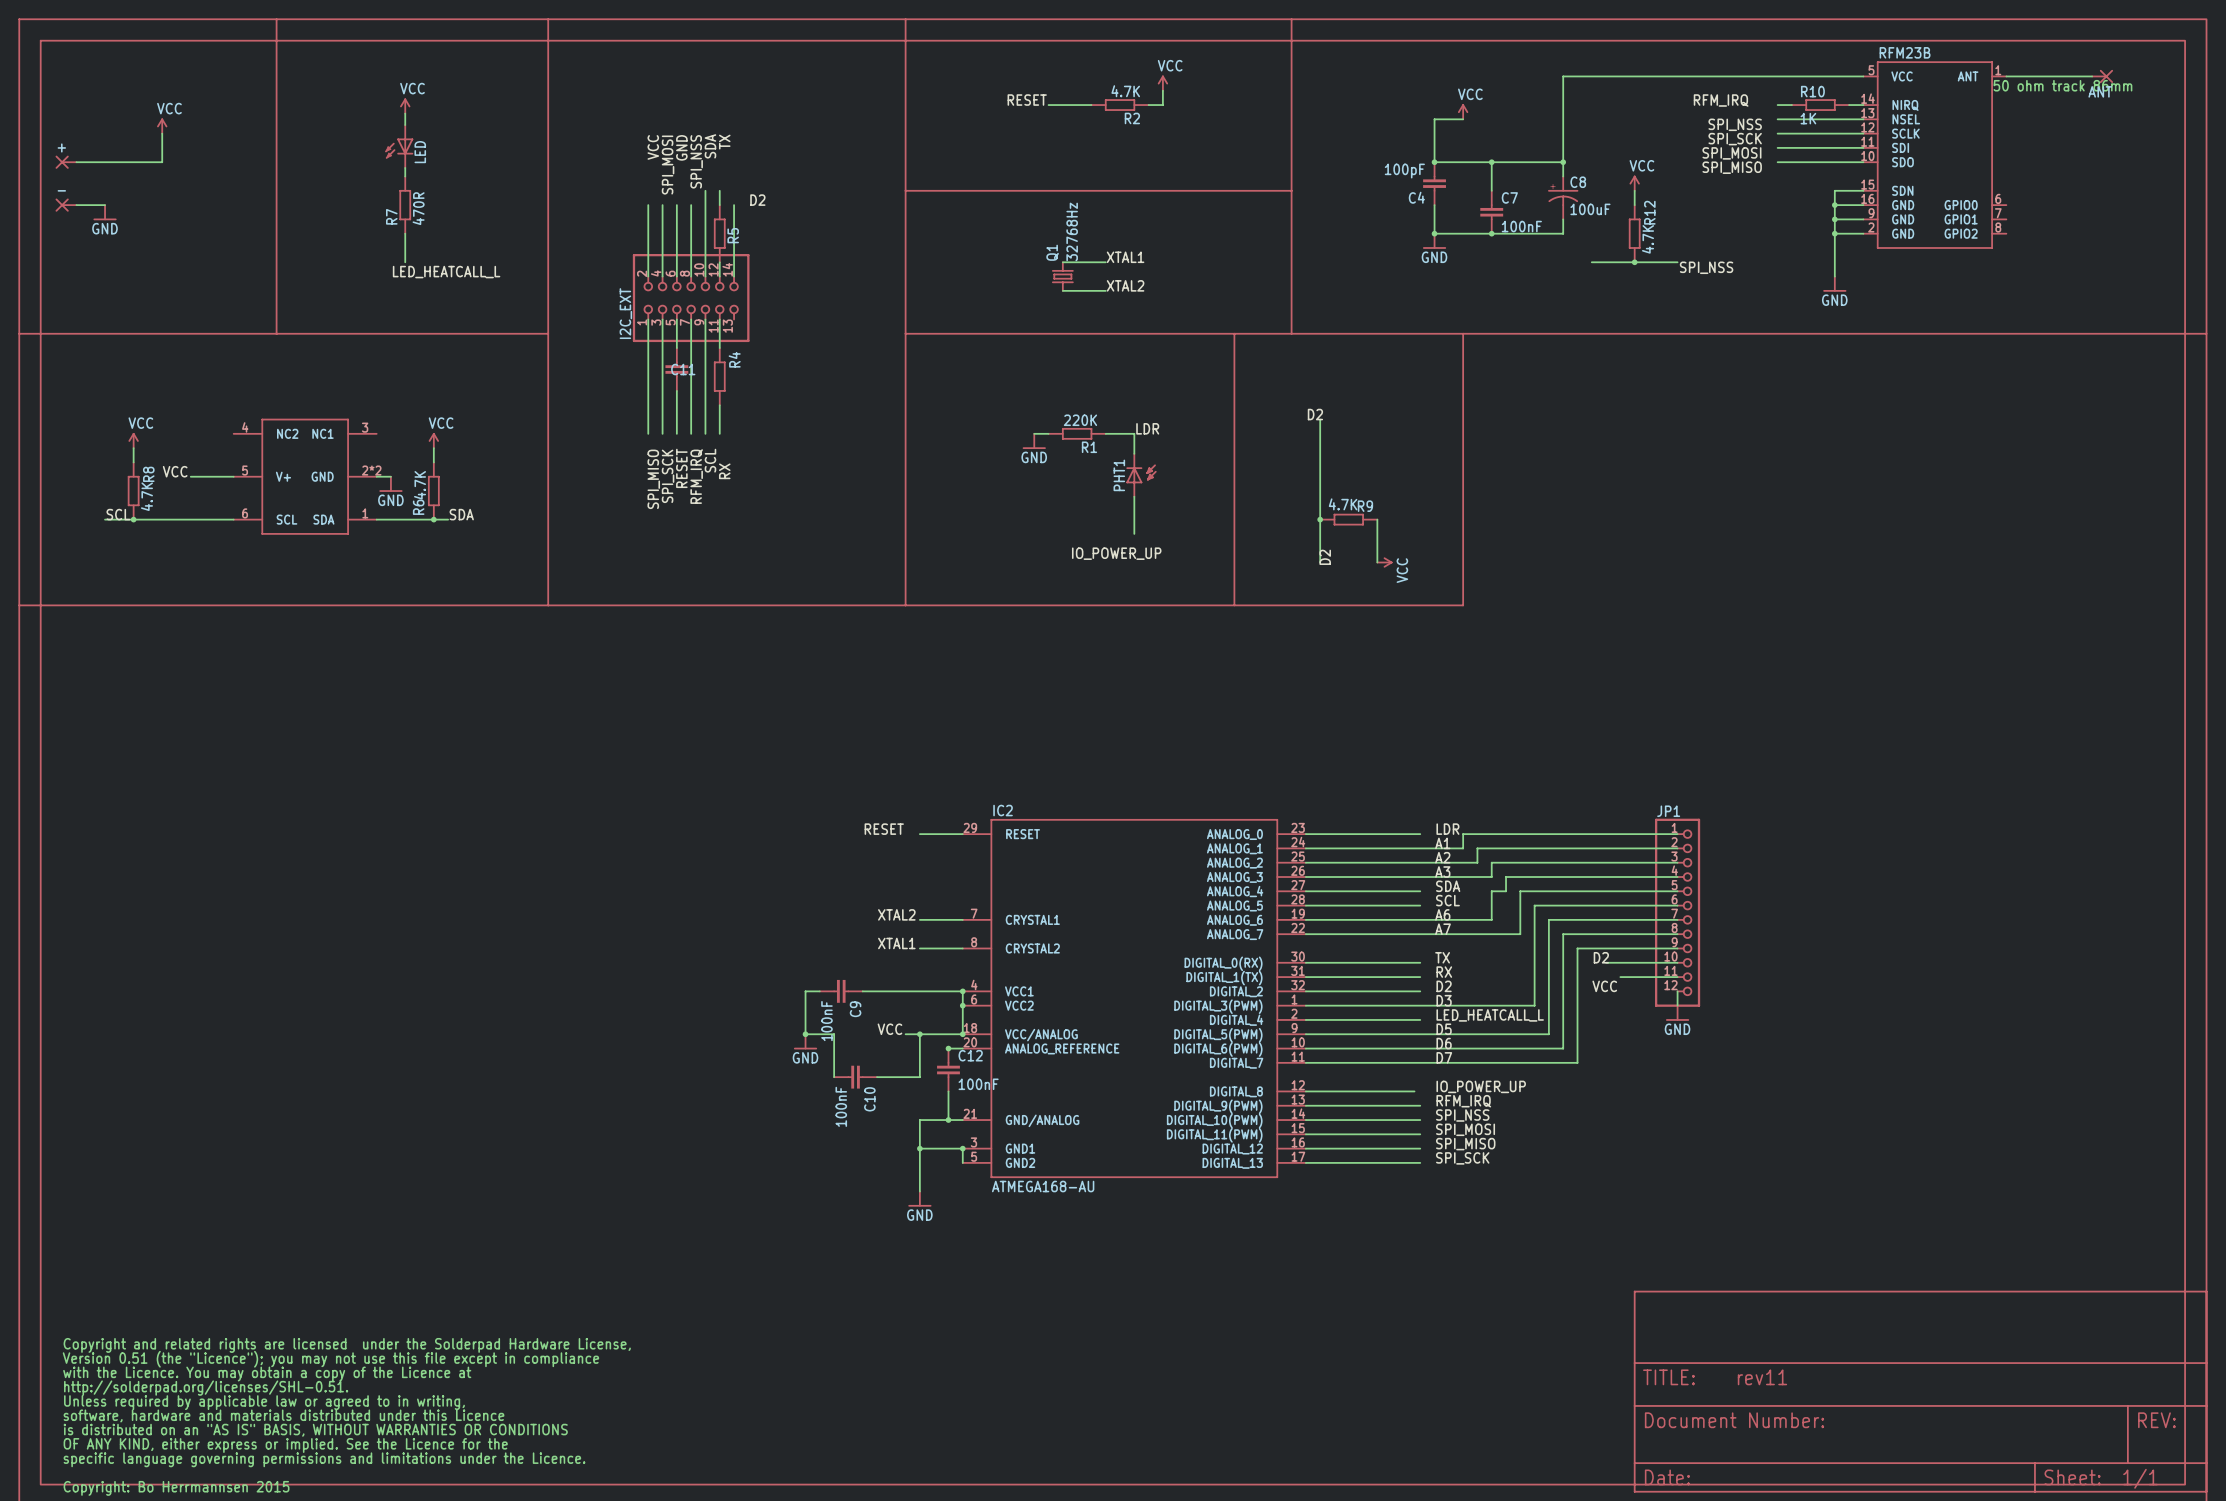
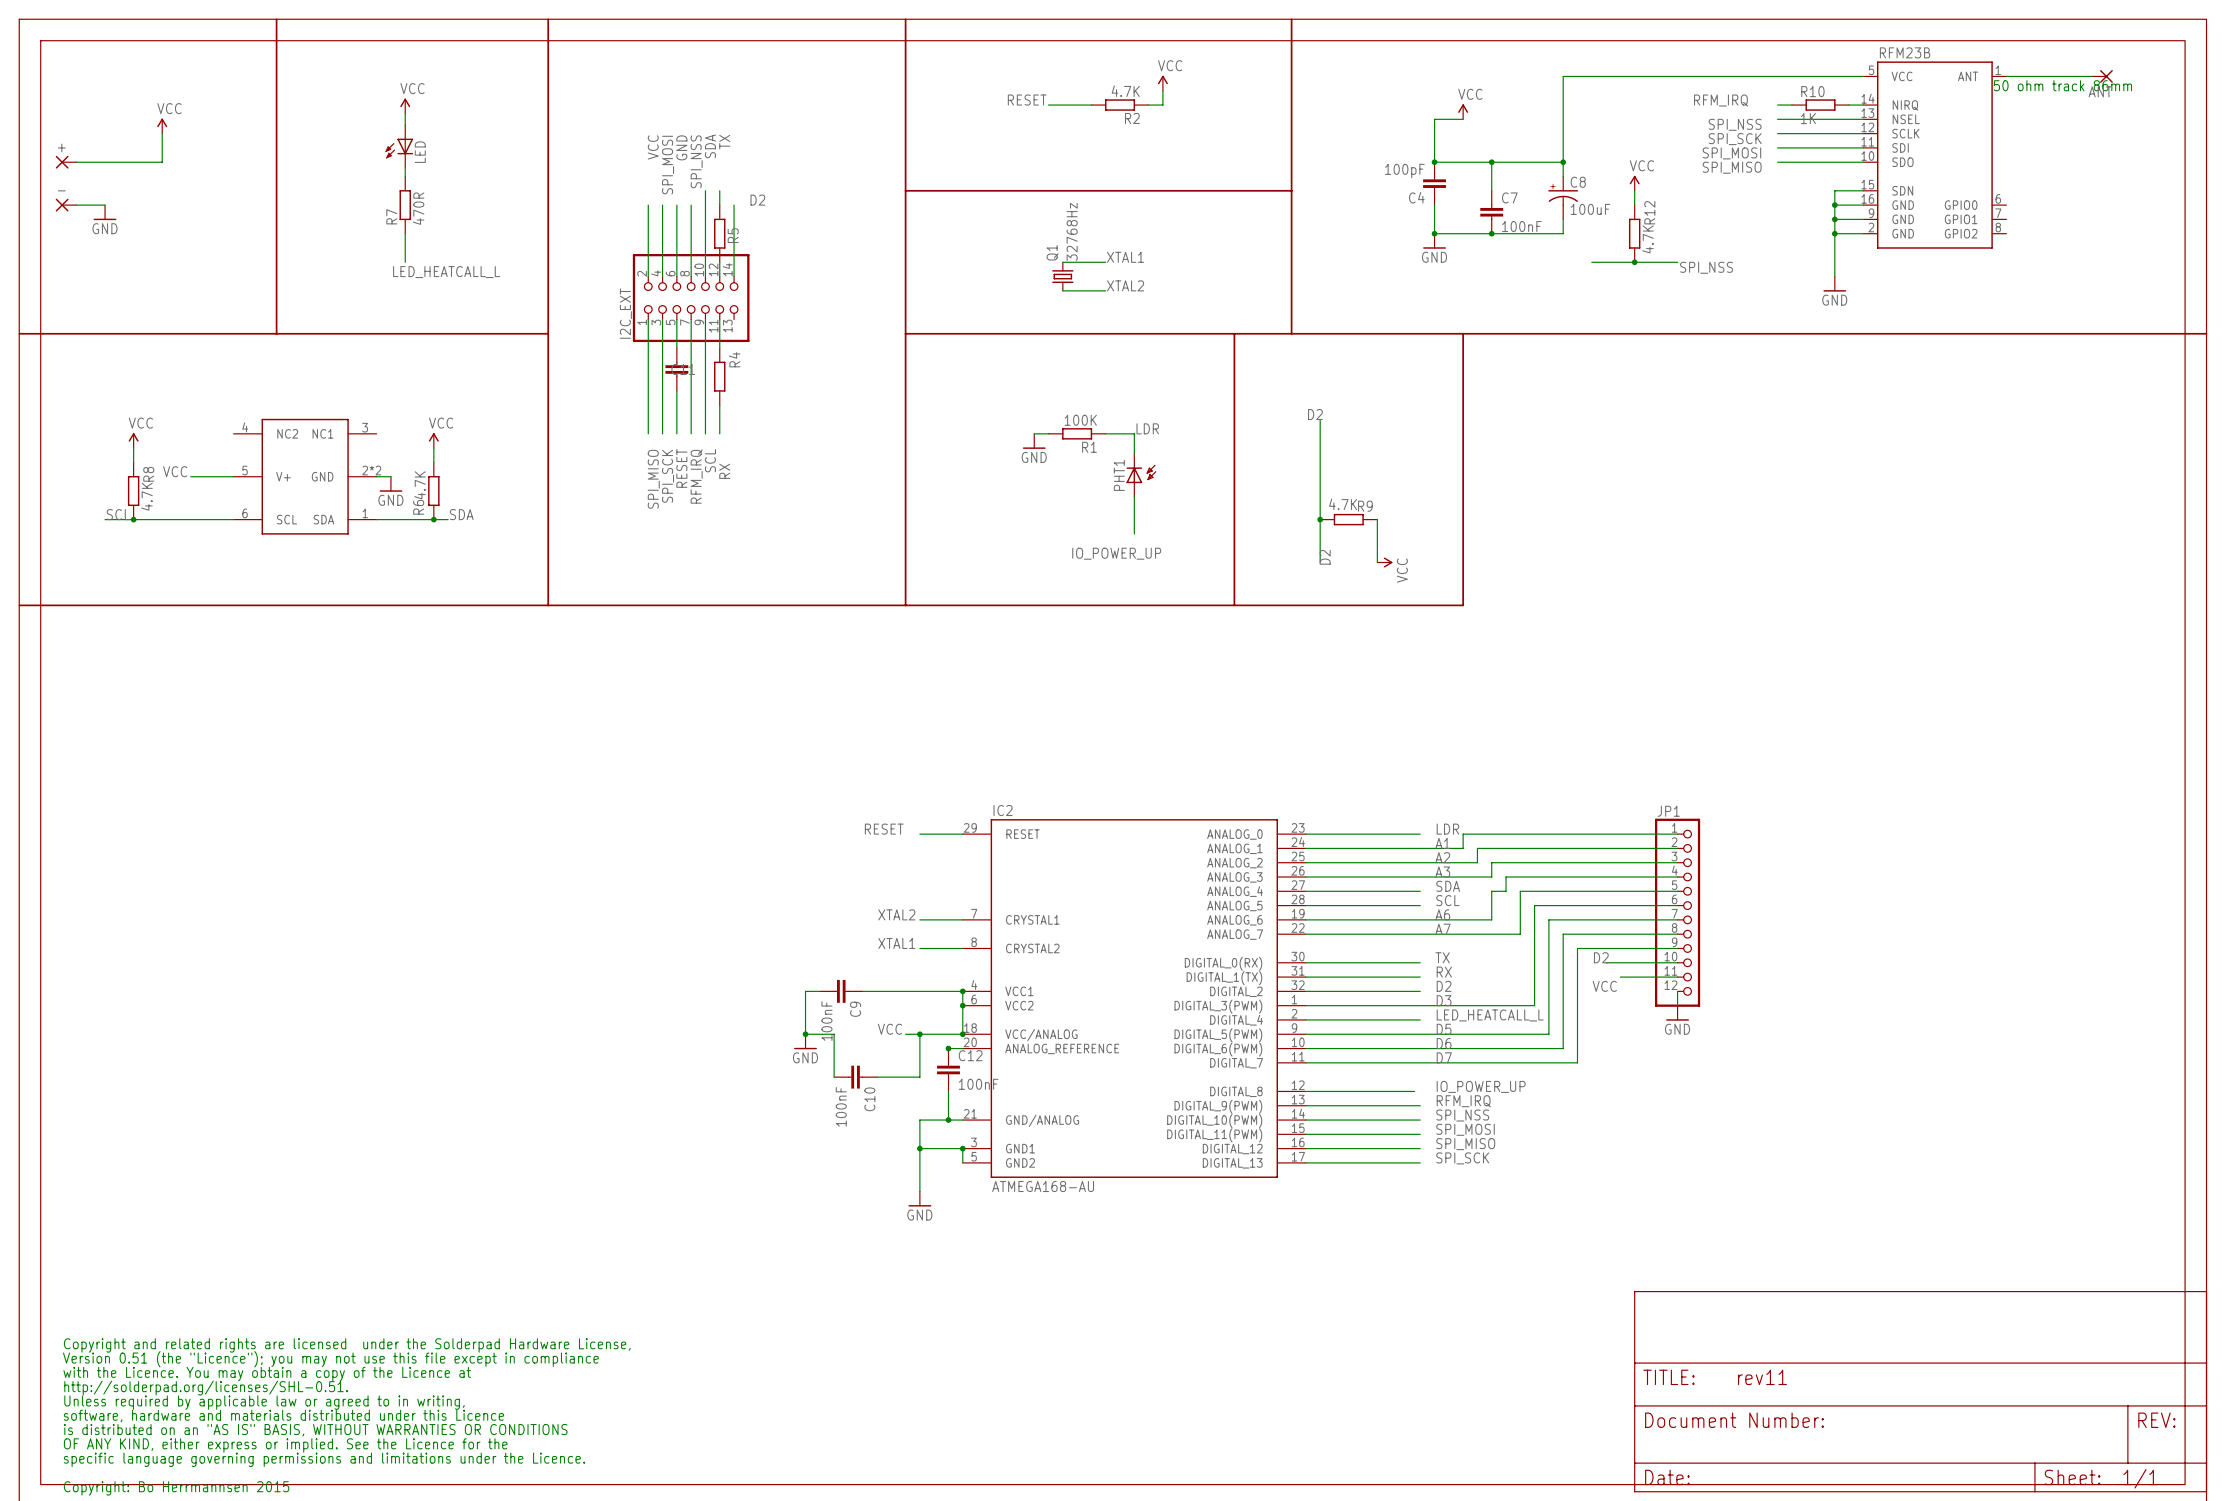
R1 value: 220K (1080, 420) -> 100K (1080, 420)

